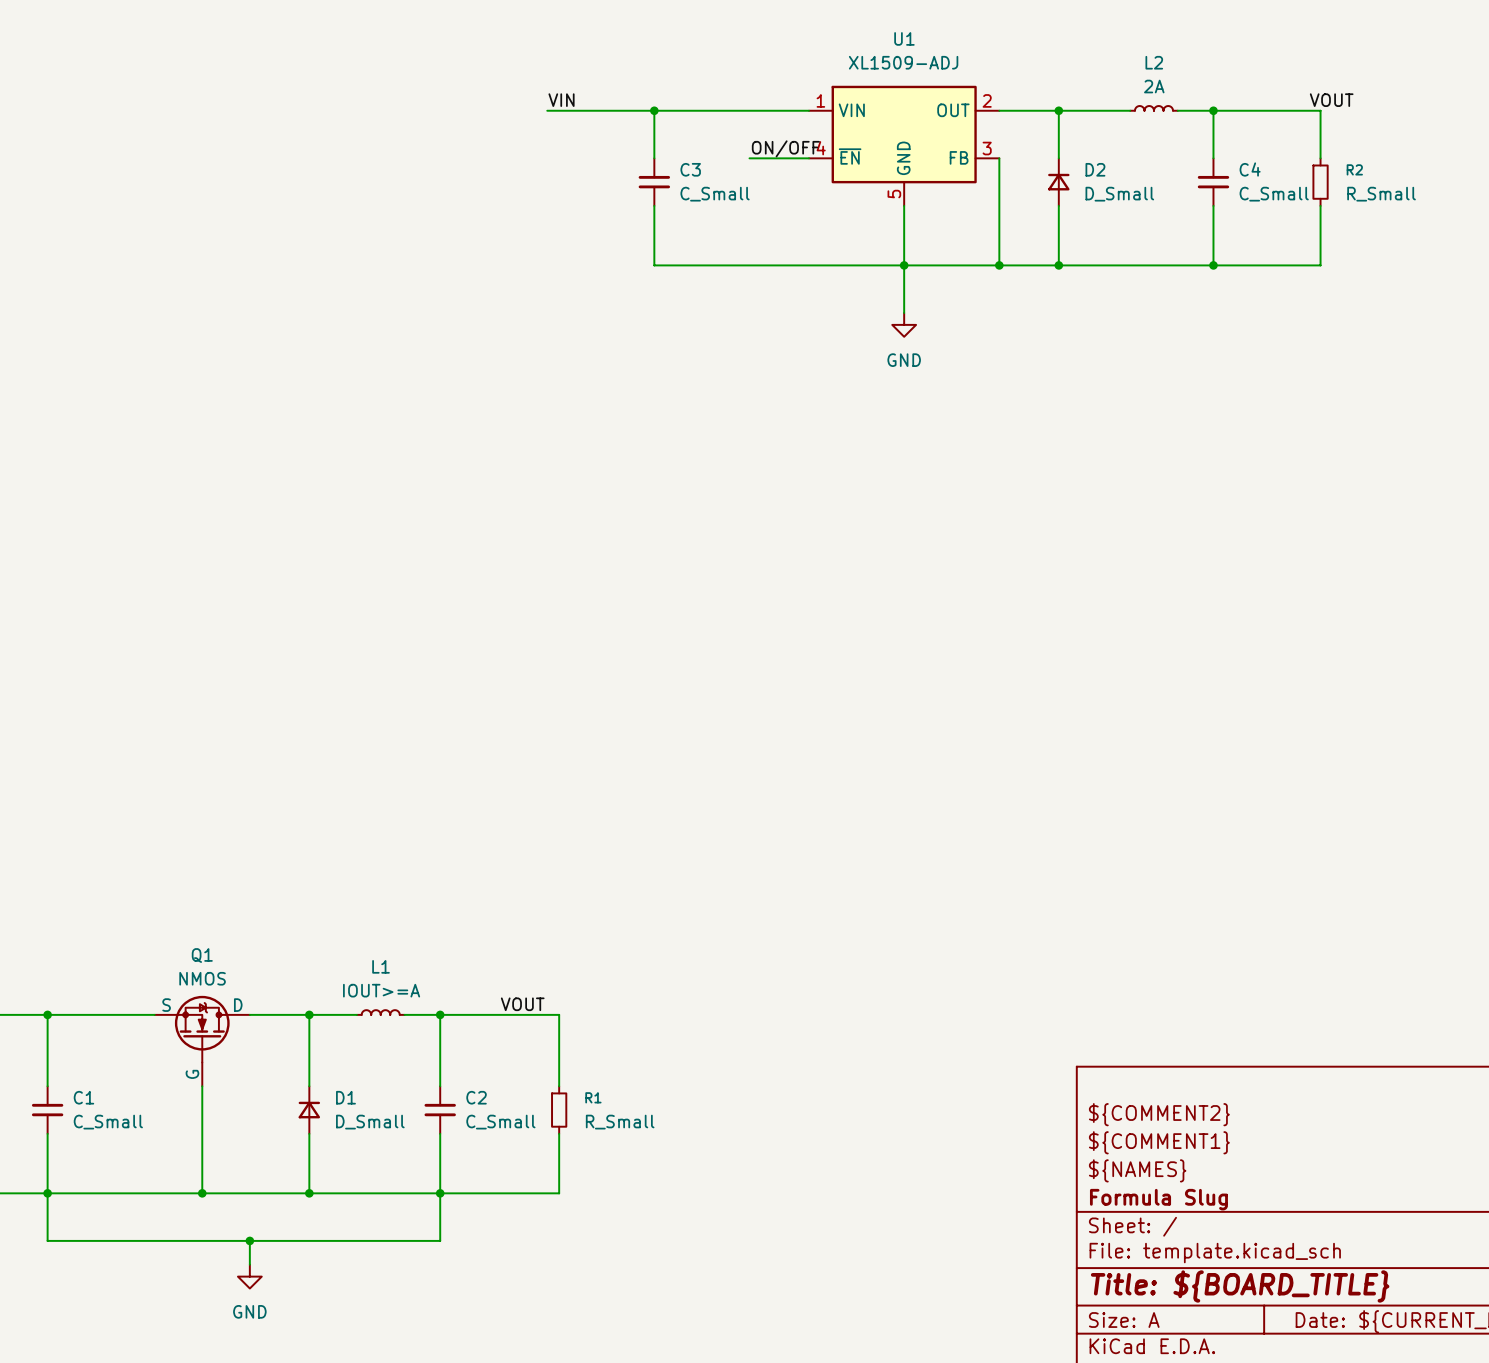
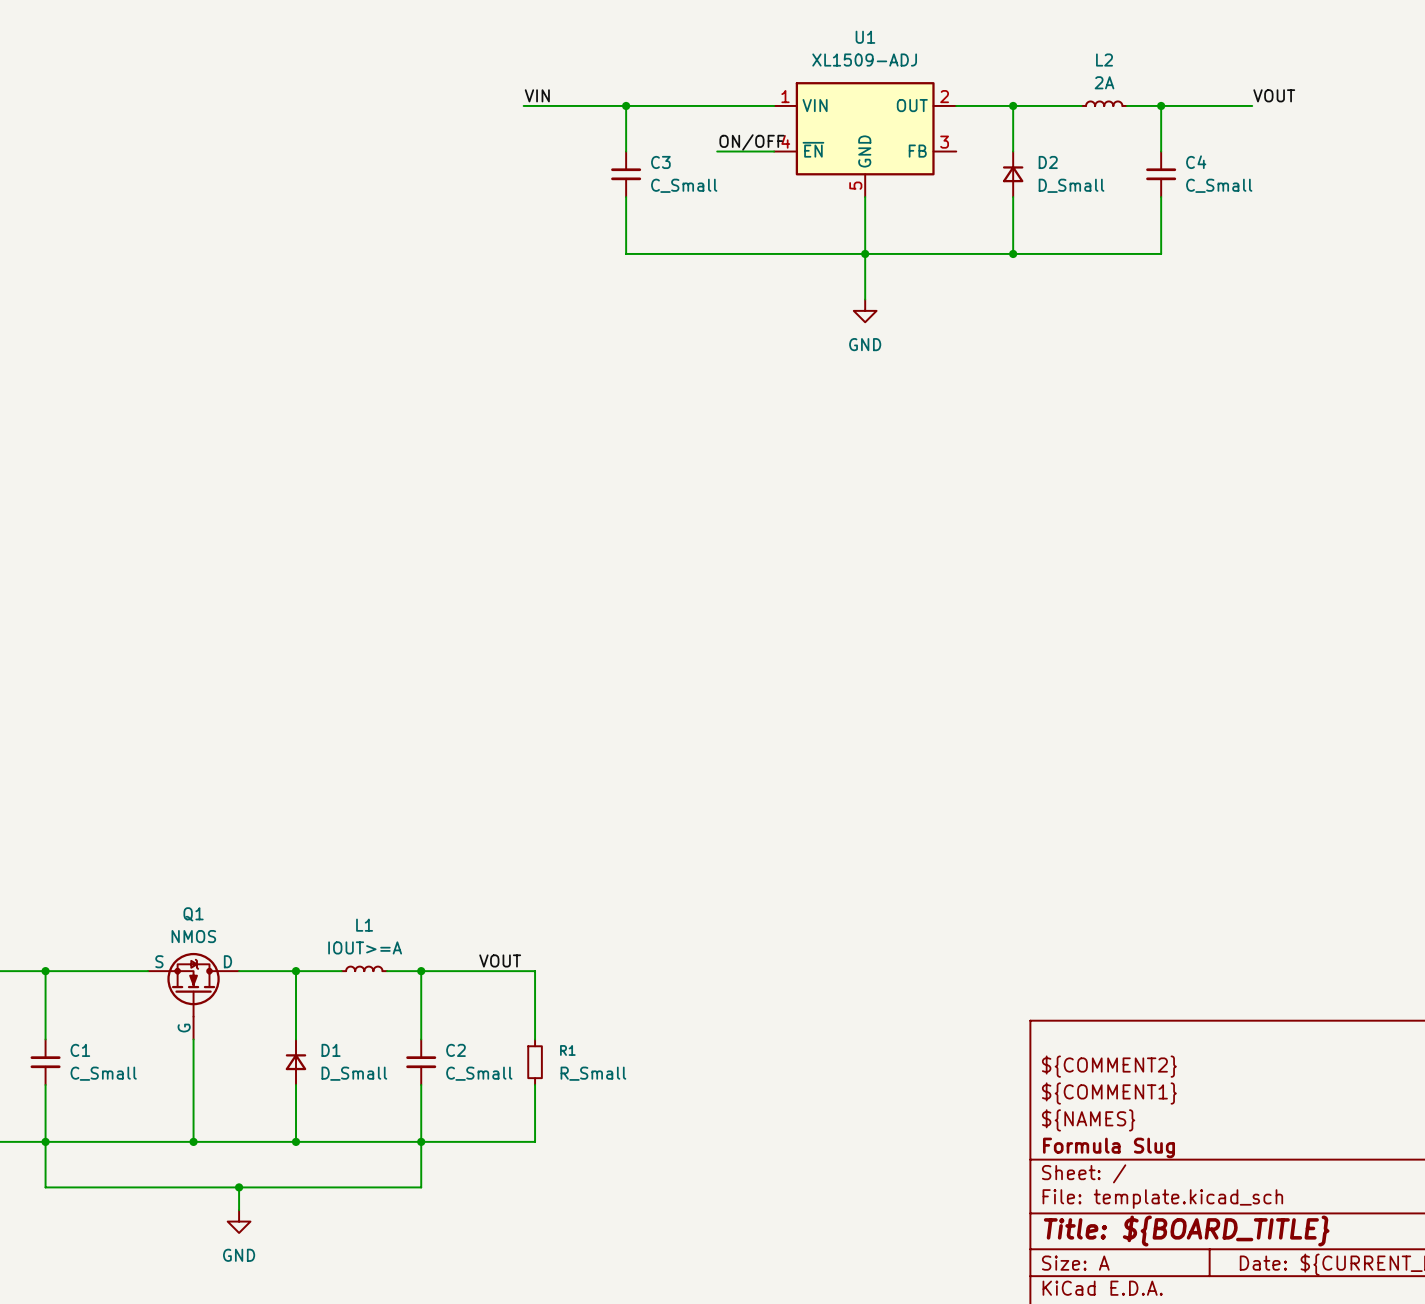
wire: (1308, 110) (1320, 110) (1320, 158) -> none
wire: (999, 158) (999, 265) -> none
R2: R_Small (1320, 182) -> none
wire: (1320, 205) (1320, 265) (1213, 265) -> none
junction: (999, 265) -> none
junction: (1213, 265) -> none

